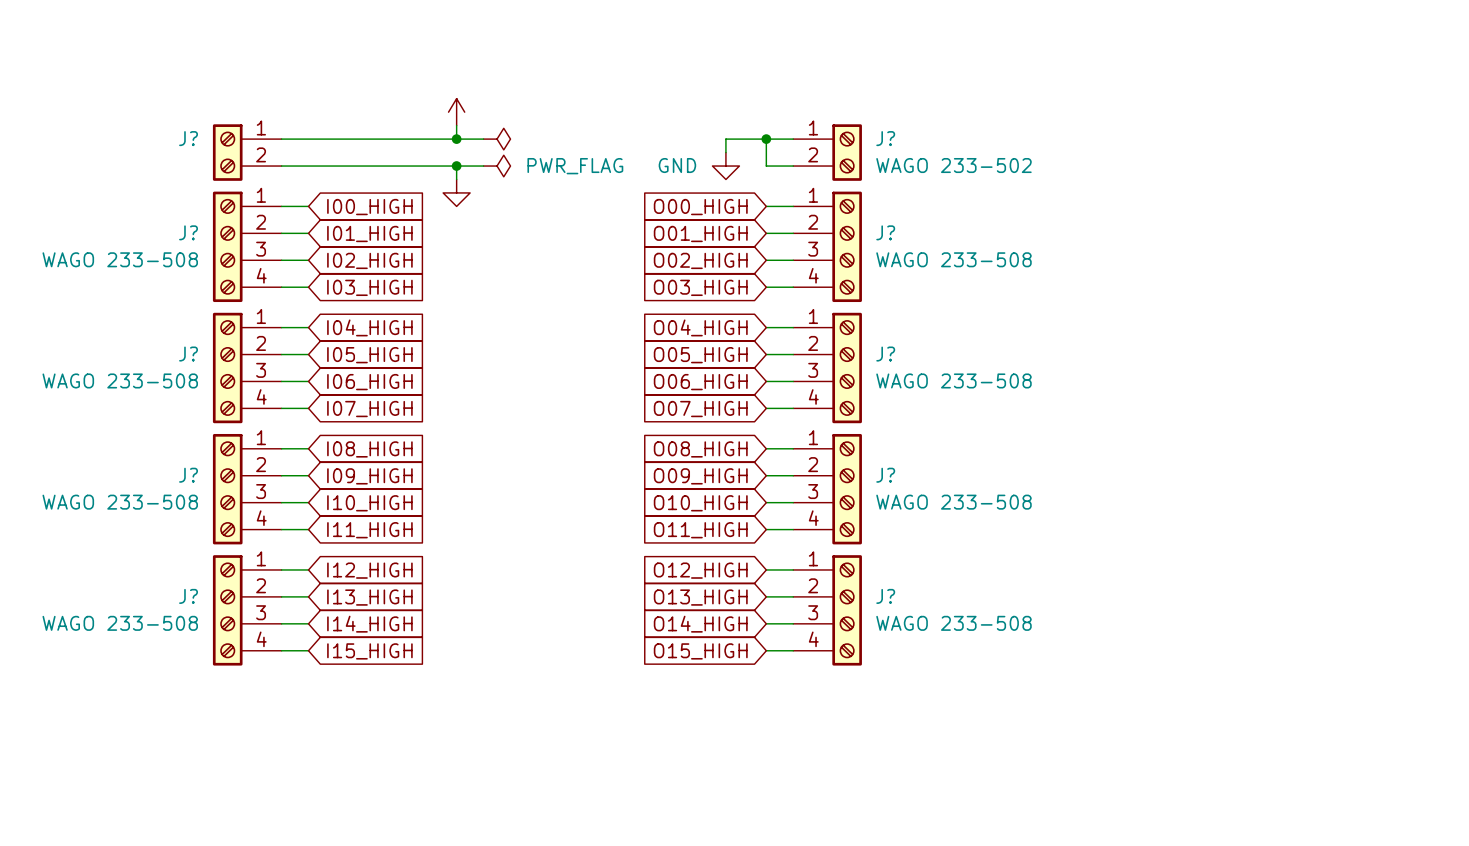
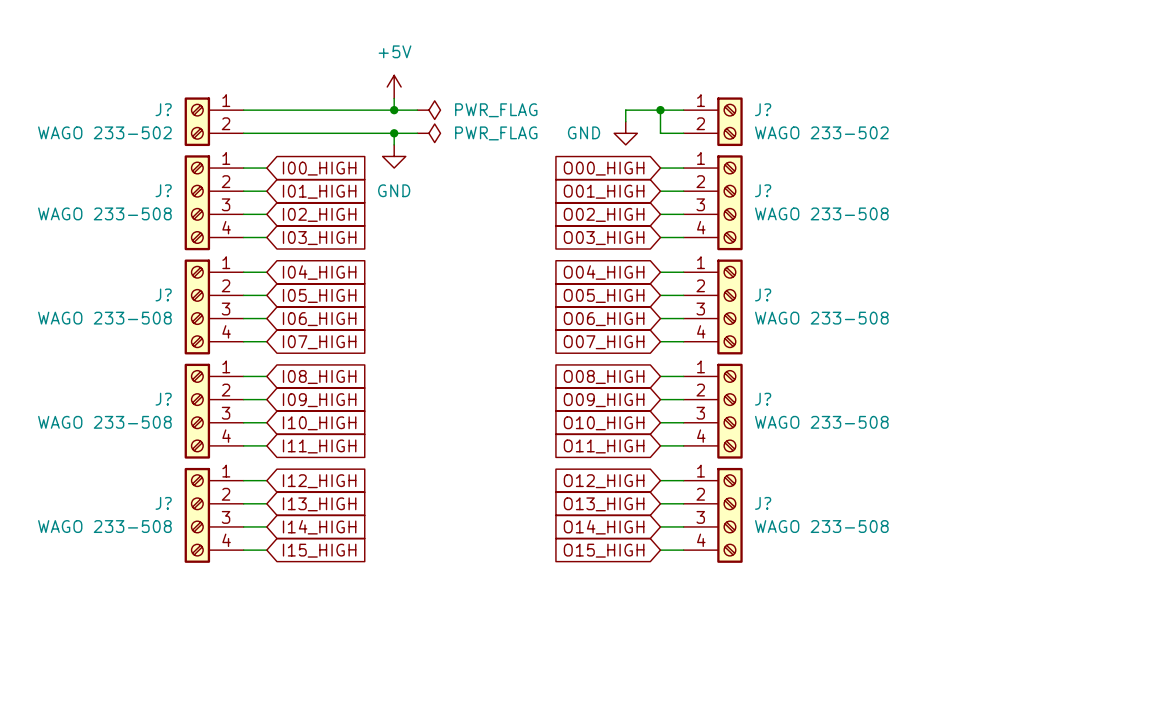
power symbol text: none -> +5V (395, 51)
power symbol text: none -> PWR_FLAG (496, 110)
J? value: none -> WAGO 233-502 (104, 132)
power symbol text: none -> GND (394, 190)

